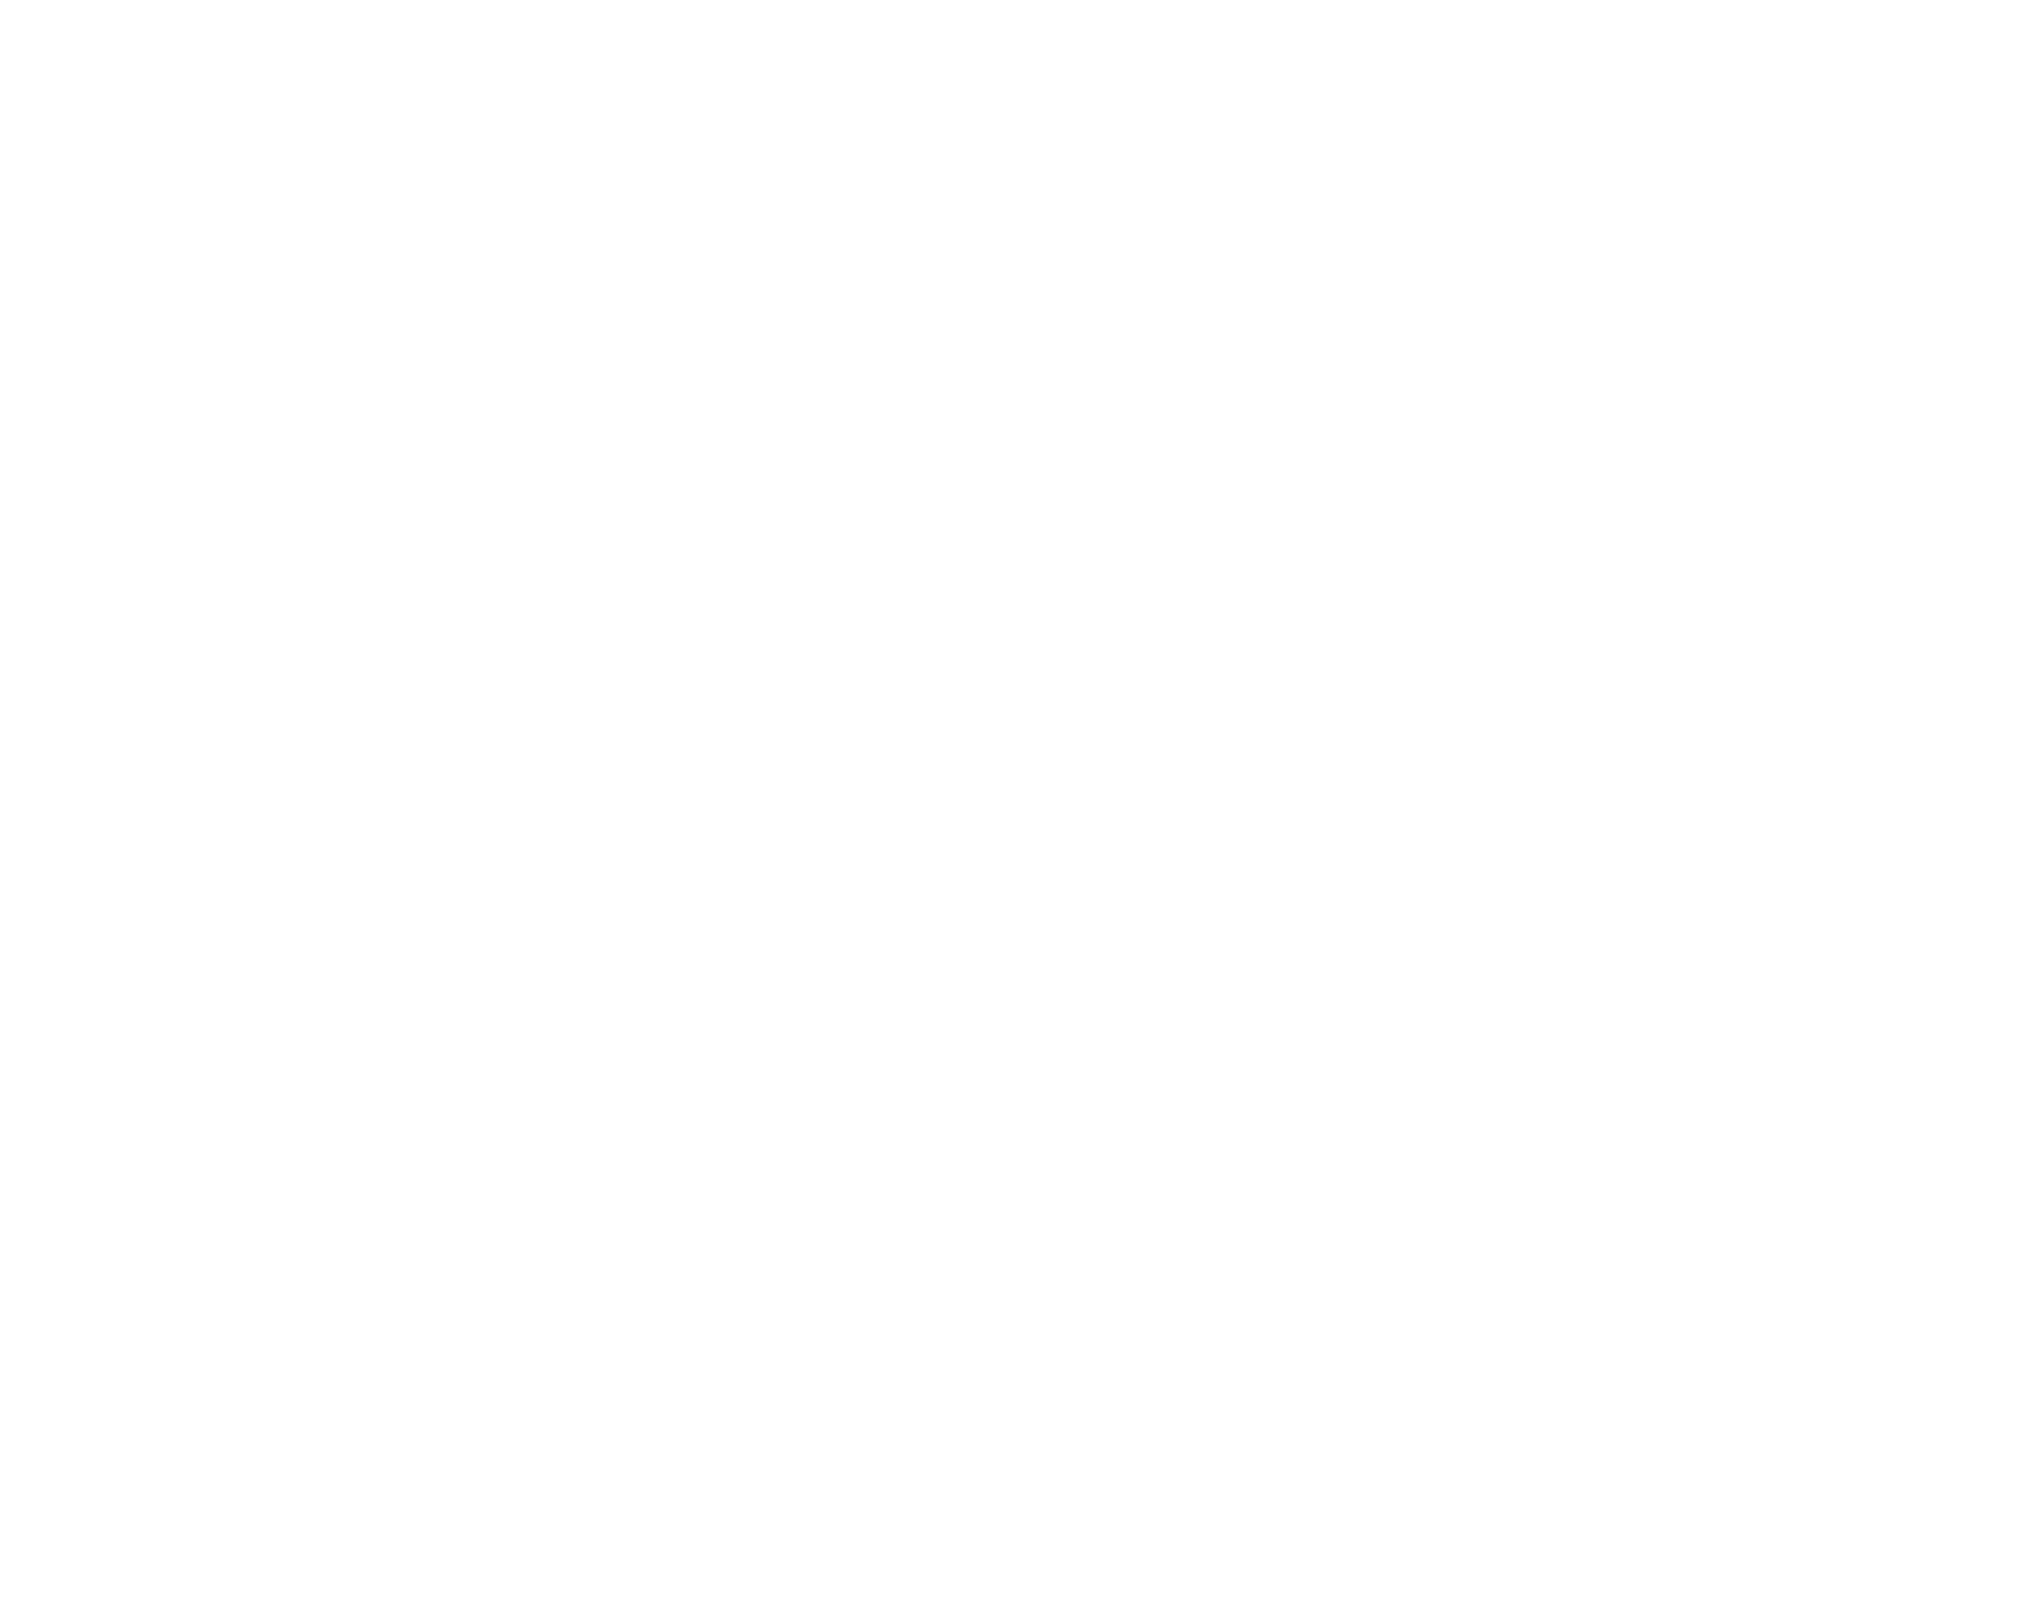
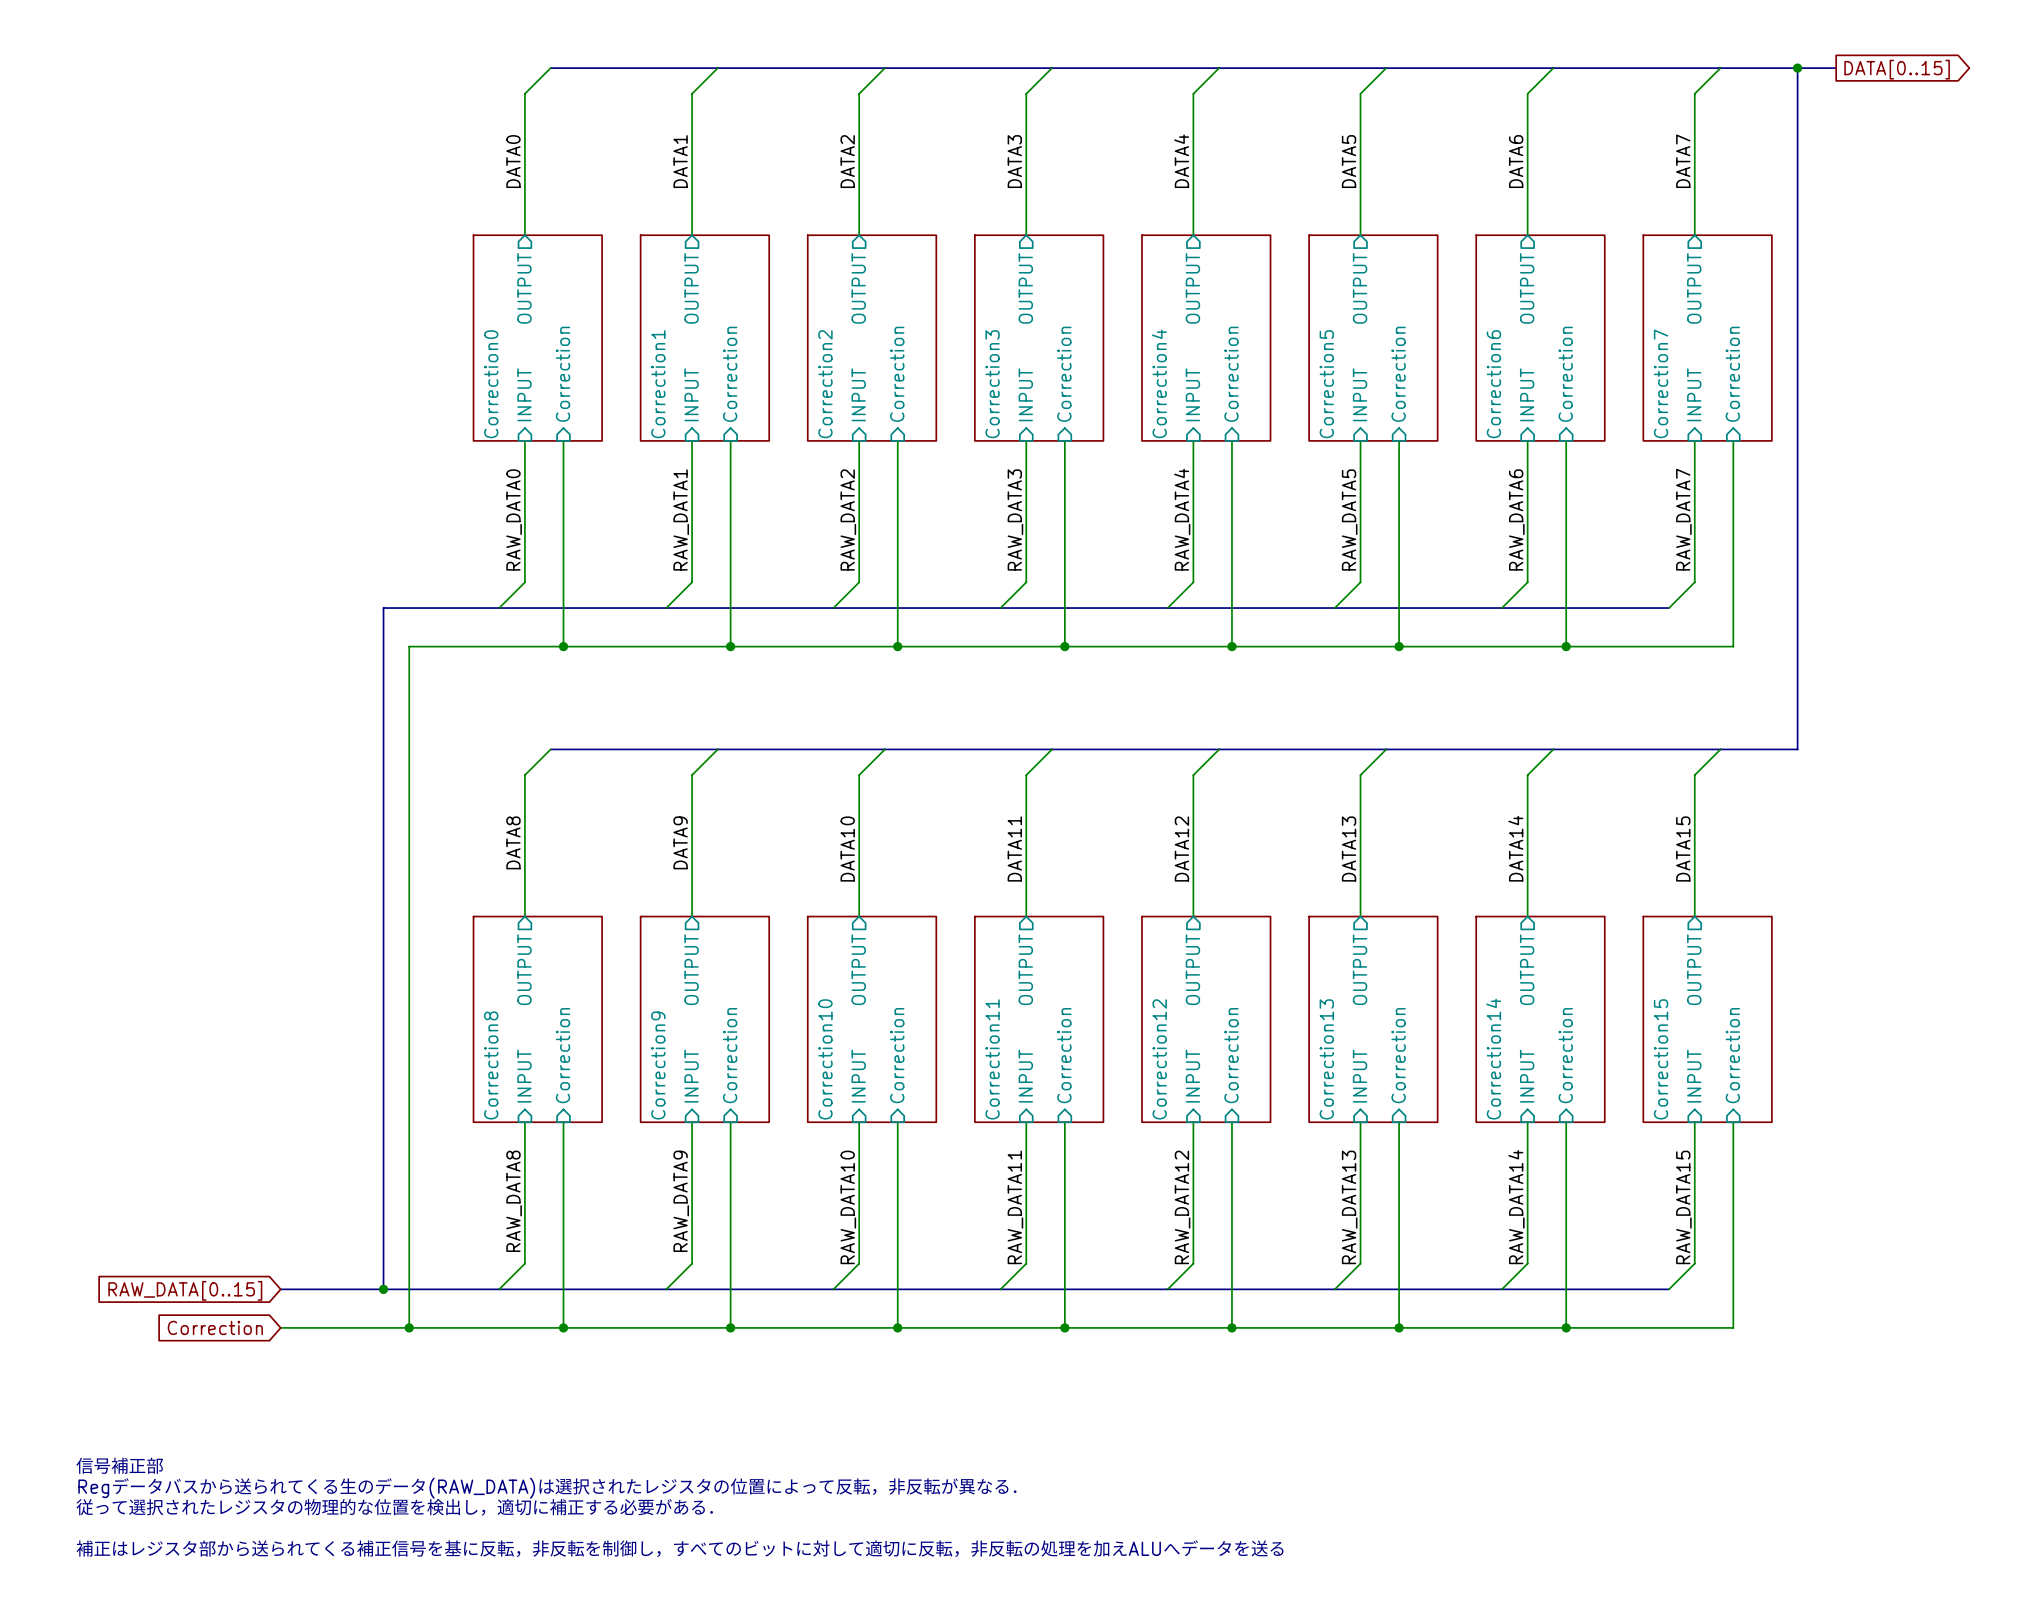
wire: none -> (550, 68) (524, 93) (524, 235)
bus: none -> (550, 68) (1836, 68)
wire: none -> (717, 68) (692, 93) (692, 235)
wire: none -> (884, 68) (859, 93) (859, 235)
wire: none -> (1052, 68) (1026, 93) (1026, 235)
wire: none -> (1219, 68) (1193, 93) (1193, 235)
wire: none -> (1386, 68) (1360, 93) (1360, 235)
wire: none -> (1553, 68) (1527, 93) (1527, 235)
wire: none -> (1720, 68) (1694, 93) (1694, 235)
bus: none -> (1797, 68) (1797, 749) (550, 749)
junction: none -> (1797, 68)
global label: none -> DATA[0..15] (1897, 69)
label: none -> DATA0 (513, 161)
label: none -> DATA1 (680, 161)
label: none -> DATA2 (847, 161)
label: none -> DATA3 (1014, 161)
label: none -> DATA4 (1181, 161)
label: none -> DATA5 (1349, 161)
label: none -> DATA6 (1516, 161)
label: none -> DATA7 (1683, 161)
sheet pin: none -> OUTPUT (524, 288)
sheet pin: none -> OUTPUT (691, 288)
sheet pin: none -> OUTPUT (858, 288)
sheet pin: none -> OUTPUT (1025, 288)
sheet pin: none -> OUTPUT (1192, 288)
sheet pin: none -> OUTPUT (1360, 288)
sheet pin: none -> OUTPUT (1527, 288)
sheet pin: none -> OUTPUT (1694, 288)
sheet Correction0: none -> (537, 338)
sheet Correction1: none -> (704, 338)
sheet Correction2: none -> (872, 338)
sheet Correction3: none -> (1039, 338)
sheet Correction4: none -> (1206, 338)
sheet Correction5: none -> (1373, 338)
sheet Correction6: none -> (1540, 338)
sheet Correction7: none -> (1707, 338)
sheet pin: none -> Correction (563, 374)
sheet pin: none -> Correction (730, 374)
sheet pin: none -> Correction (897, 374)
sheet pin: none -> Correction (1064, 374)
sheet pin: none -> Correction (1231, 374)
sheet pin: none -> Correction (1398, 374)
sheet pin: none -> Correction (1565, 374)
sheet pin: none -> Correction (1732, 374)
sheet pin: none -> INPUT (524, 394)
sheet pin: none -> INPUT (691, 394)
sheet pin: none -> INPUT (858, 394)
sheet pin: none -> INPUT (1025, 394)
sheet pin: none -> INPUT (1192, 394)
sheet pin: none -> INPUT (1360, 394)
sheet pin: none -> INPUT (1527, 394)
sheet pin: none -> INPUT (1694, 394)
wire: none -> (524, 440) (524, 582) (499, 608)
wire: none -> (563, 440) (563, 646)
wire: none -> (692, 440) (692, 582) (666, 608)
wire: none -> (730, 440) (730, 646)
wire: none -> (859, 440) (859, 582) (833, 608)
wire: none -> (897, 440) (897, 646)
wire: none -> (1026, 440) (1026, 582) (1000, 608)
wire: none -> (1064, 440) (1064, 646)
wire: none -> (1193, 440) (1193, 582) (1167, 608)
wire: none -> (1231, 440) (1231, 646)
wire: none -> (1360, 440) (1360, 582) (1334, 608)
wire: none -> (1399, 440) (1399, 646)
wire: none -> (1527, 440) (1527, 582) (1501, 608)
wire: none -> (1566, 440) (1566, 646)
wire: none -> (1694, 440) (1694, 582) (1669, 608)
wire: none -> (1733, 440) (1733, 646) (409, 646) (409, 1327)
label: none -> RAW_DATA0 (514, 519)
label: none -> RAW_DATA1 (681, 519)
label: none -> RAW_DATA2 (848, 519)
label: none -> RAW_DATA3 (1015, 519)
label: none -> RAW_DATA4 (1182, 519)
label: none -> RAW_DATA5 (1349, 519)
label: none -> RAW_DATA6 (1516, 519)
label: none -> RAW_DATA7 (1683, 519)
bus: none -> (1669, 608) (383, 608) (383, 1289)
junction: none -> (563, 646)
junction: none -> (730, 646)
junction: none -> (897, 646)
junction: none -> (1064, 646)
junction: none -> (1231, 646)
junction: none -> (1399, 646)
junction: none -> (1566, 646)
wire: none -> (550, 749) (524, 775) (524, 916)
wire: none -> (717, 749) (692, 775) (692, 916)
wire: none -> (884, 749) (859, 775) (859, 916)
wire: none -> (1052, 749) (1026, 775) (1026, 916)
wire: none -> (1219, 749) (1193, 775) (1193, 916)
wire: none -> (1386, 749) (1360, 775) (1360, 916)
wire: none -> (1553, 749) (1527, 775) (1527, 916)
wire: none -> (1720, 749) (1694, 775) (1694, 916)
label: none -> DATA8 (513, 842)
label: none -> DATA9 (680, 842)
label: none -> DATA14 (1515, 848)
label: none -> DATA10 (847, 849)
label: none -> DATA11 (1014, 849)
label: none -> DATA12 (1181, 849)
label: none -> DATA13 (1349, 849)
label: none -> DATA15 (1683, 849)
sheet pin: none -> OUTPUT (524, 969)
sheet pin: none -> OUTPUT (691, 969)
sheet pin: none -> OUTPUT (858, 969)
sheet pin: none -> OUTPUT (1025, 969)
sheet pin: none -> OUTPUT (1192, 969)
sheet pin: none -> OUTPUT (1360, 969)
sheet pin: none -> OUTPUT (1527, 969)
sheet pin: none -> OUTPUT (1694, 969)
sheet Correction8: none -> (537, 1019)
sheet Correction9: none -> (704, 1019)
sheet Correction10: none -> (872, 1019)
sheet Correction11: none -> (1039, 1019)
sheet Correction12: none -> (1206, 1019)
sheet Correction13: none -> (1373, 1019)
sheet Correction14: none -> (1540, 1019)
sheet Correction15: none -> (1707, 1019)
sheet pin: none -> Correction (563, 1055)
sheet pin: none -> Correction (730, 1055)
sheet pin: none -> Correction (897, 1055)
sheet pin: none -> Correction (1064, 1055)
sheet pin: none -> Correction (1231, 1055)
sheet pin: none -> Correction (1398, 1055)
sheet pin: none -> Correction (1565, 1055)
sheet pin: none -> Correction (1732, 1055)
sheet pin: none -> INPUT (524, 1076)
sheet pin: none -> INPUT (691, 1076)
sheet pin: none -> INPUT (858, 1076)
sheet pin: none -> INPUT (1025, 1076)
sheet pin: none -> INPUT (1192, 1076)
sheet pin: none -> INPUT (1360, 1076)
sheet pin: none -> INPUT (1527, 1076)
sheet pin: none -> INPUT (1694, 1076)
wire: none -> (524, 1122) (524, 1263) (499, 1289)
wire: none -> (563, 1122) (563, 1327)
wire: none -> (692, 1122) (692, 1263) (666, 1289)
wire: none -> (730, 1122) (730, 1327)
wire: none -> (859, 1122) (859, 1263) (833, 1289)
wire: none -> (897, 1122) (897, 1327)
wire: none -> (1026, 1122) (1026, 1263) (1000, 1289)
wire: none -> (1064, 1122) (1064, 1327)
wire: none -> (1193, 1122) (1193, 1263) (1167, 1289)
wire: none -> (1231, 1122) (1231, 1327)
wire: none -> (1360, 1122) (1360, 1263) (1334, 1289)
wire: none -> (1399, 1122) (1399, 1327)
wire: none -> (1527, 1122) (1527, 1263) (1501, 1289)
wire: none -> (1566, 1122) (1566, 1327)
wire: none -> (1694, 1122) (1694, 1263) (1669, 1289)
wire: none -> (1733, 1122) (1733, 1327) (280, 1327)
label: none -> RAW_DATA8 (514, 1201)
label: none -> RAW_DATA9 (681, 1201)
label: none -> RAW_DATA10 (848, 1207)
label: none -> RAW_DATA11 (1015, 1207)
label: none -> RAW_DATA12 (1182, 1207)
label: none -> RAW_DATA13 (1349, 1207)
label: none -> RAW_DATA14 (1516, 1207)
label: none -> RAW_DATA15 (1683, 1207)
bus: none -> (280, 1289) (1669, 1289)
junction: none -> (383, 1289)
global label: none -> RAW_DATA[0..15] (185, 1290)
global label: none -> Correction (215, 1327)
junction: none -> (409, 1327)
junction: none -> (563, 1327)
junction: none -> (730, 1327)
junction: none -> (897, 1327)
junction: none -> (1064, 1327)
junction: none -> (1231, 1327)
junction: none -> (1399, 1327)
junction: none -> (1566, 1327)
text: none -> 信号補正部 (119, 1465)
text: none -> Regデータバスから送られてくる生のデータ(RAW_DATA)は選択されたレジスタの位置によって反転，非反転が異なる． (547, 1488)
text: none -> 従って選択されたレジスタの物理的な位置を検出し，適切に補正する必要がある． (394, 1507)
text: none -> 補正はレジスタ部から送られてくる補正信号を基に反転，非反転を制御し，すべてのビットに対して適切に反転，非反転の処理を加えALUへデータを送る (680, 1548)

